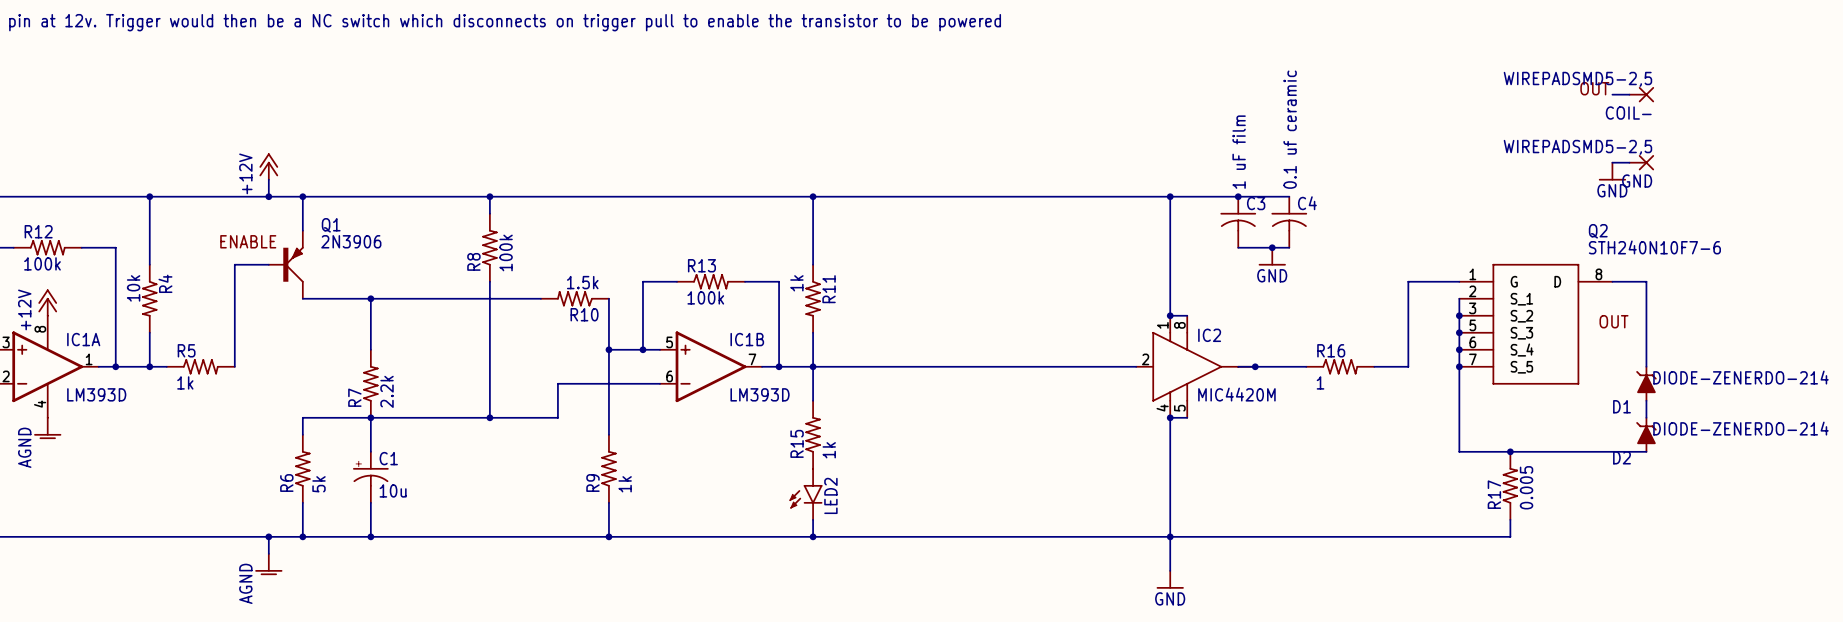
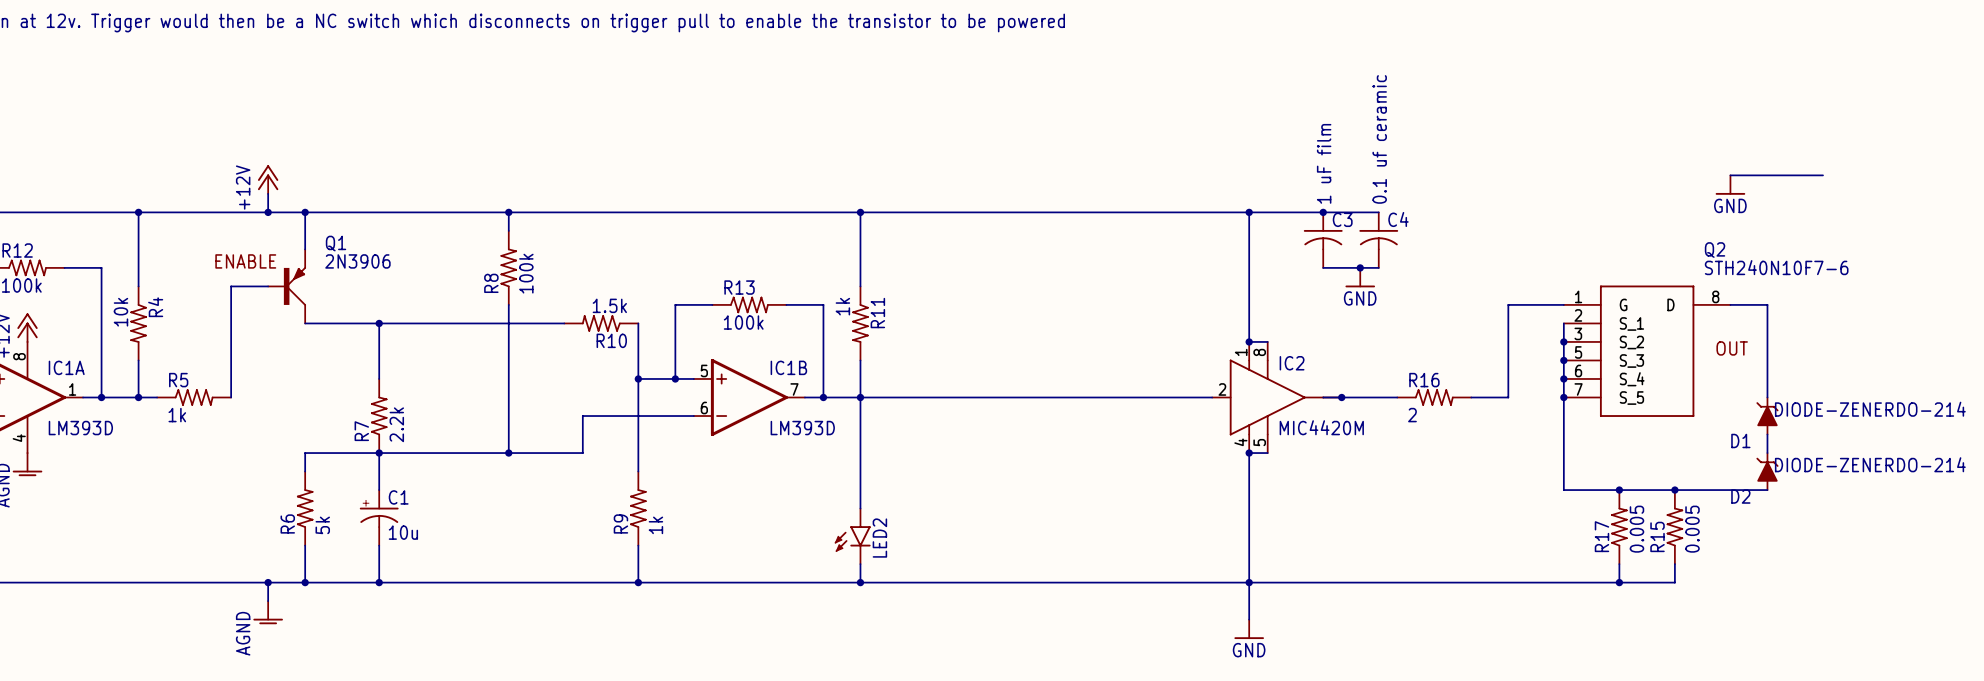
label: OUT (1594, 88) -> none
wire: (1612, 94) (1629, 94) -> none
COIL-: WIREPADSMD5-2,5 (1641, 94) -> none
wire: none -> (1748, 175) (1823, 175)
GND: WIREPADSMD5-2,5 (1641, 162) -> none
R16 value: 1 (1320, 382) -> 2 (1412, 415)
R15 position: (813, 434) -> (1674, 527)
R15 value: 1k (829, 450) -> 0.005 (1692, 529)
junction: none -> (1674, 490)
wire: none -> (1674, 564) (1674, 582) (1619, 582)
junction: none -> (1619, 582)

